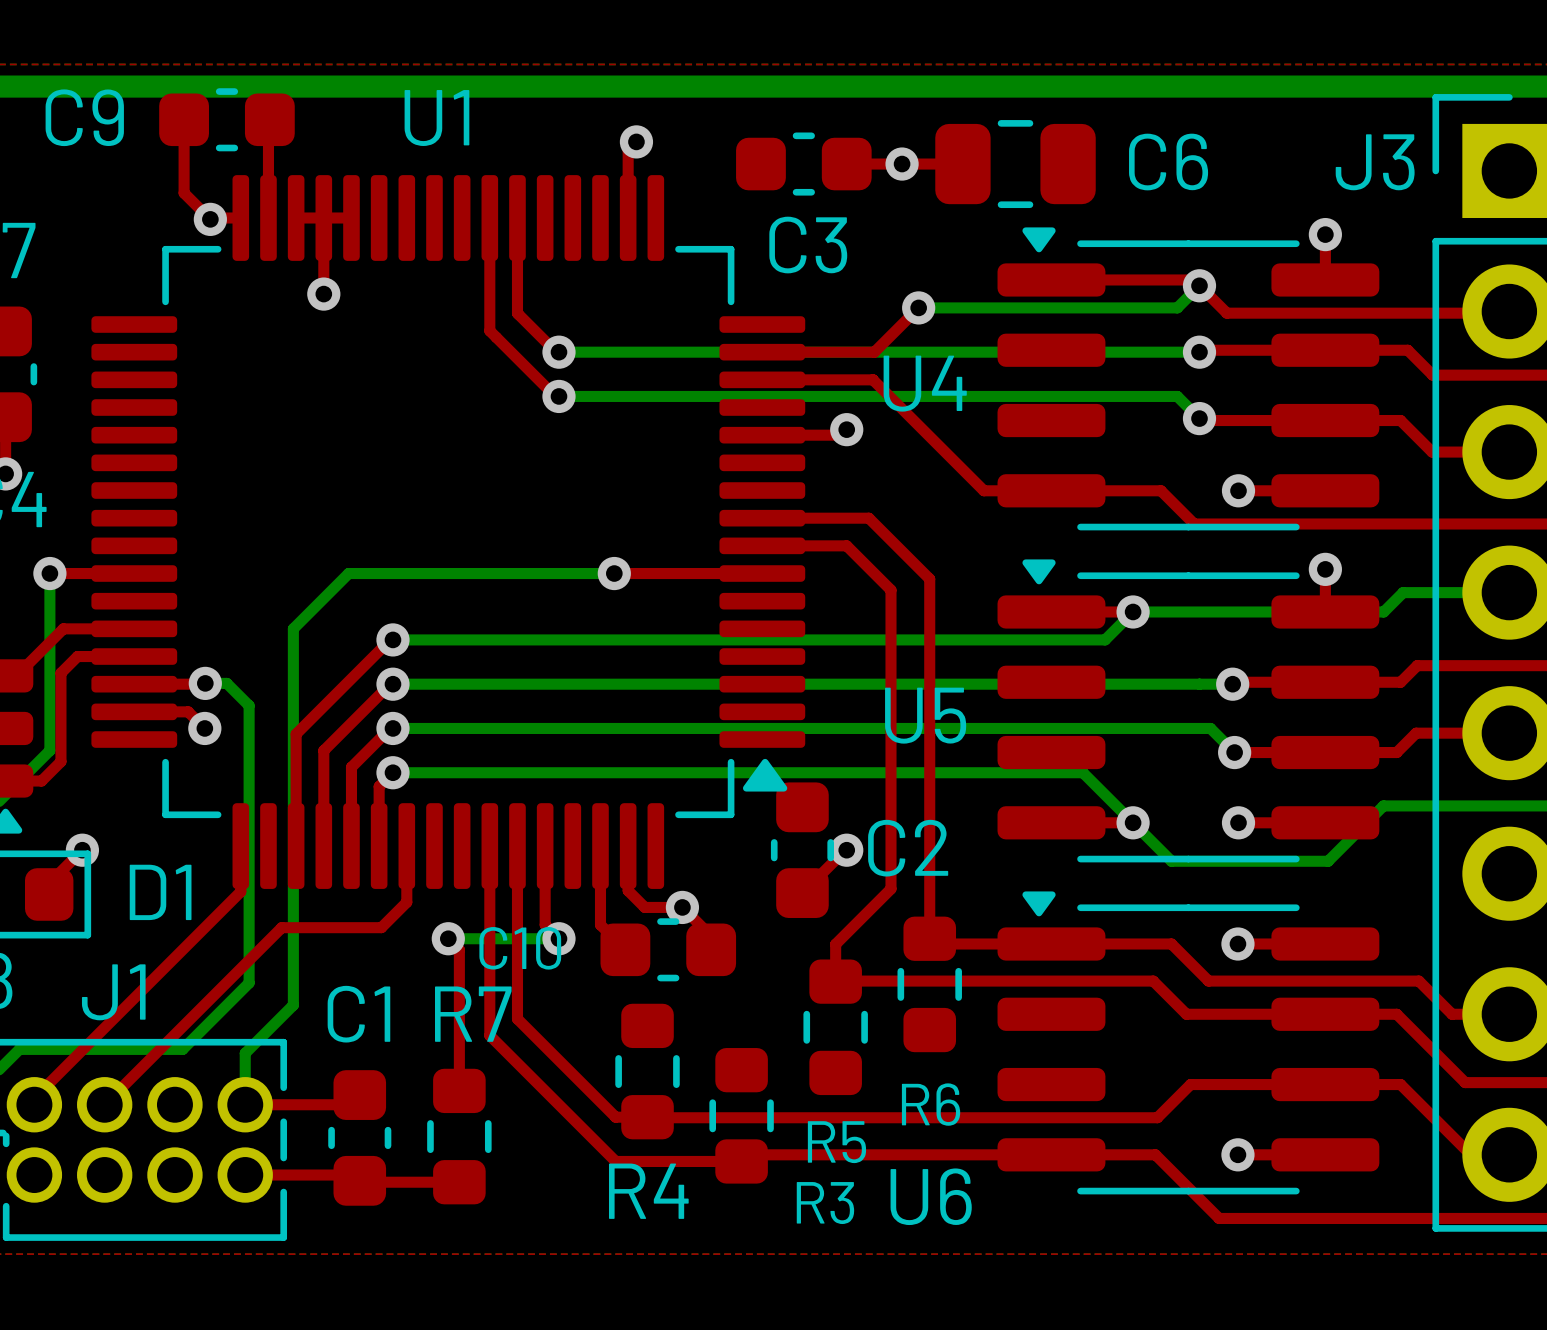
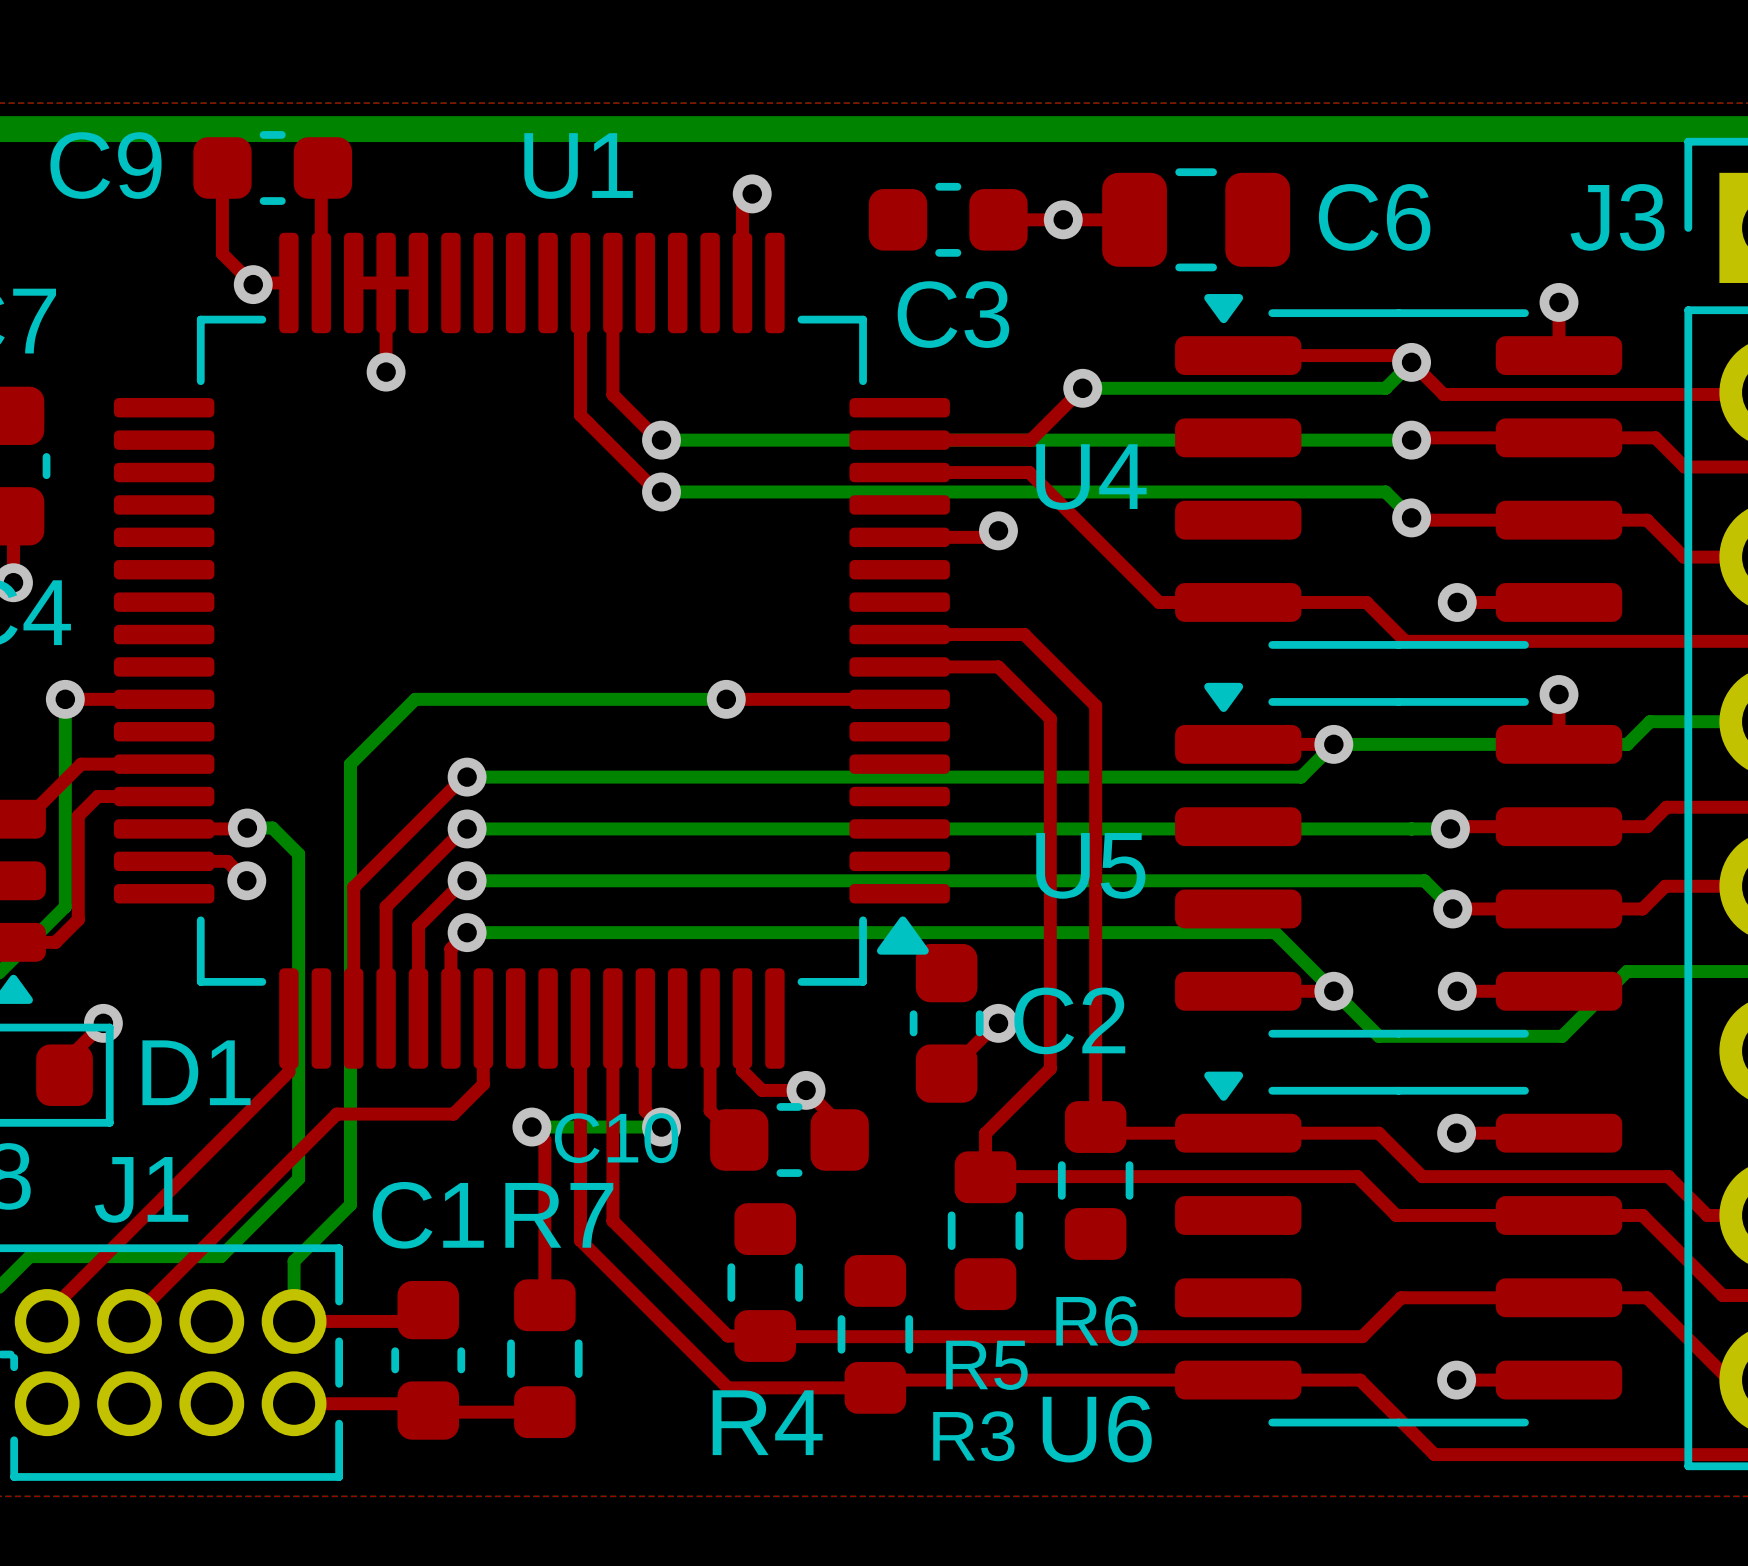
U1 name position: U1 (436, 118) -> U1 (578, 166)

